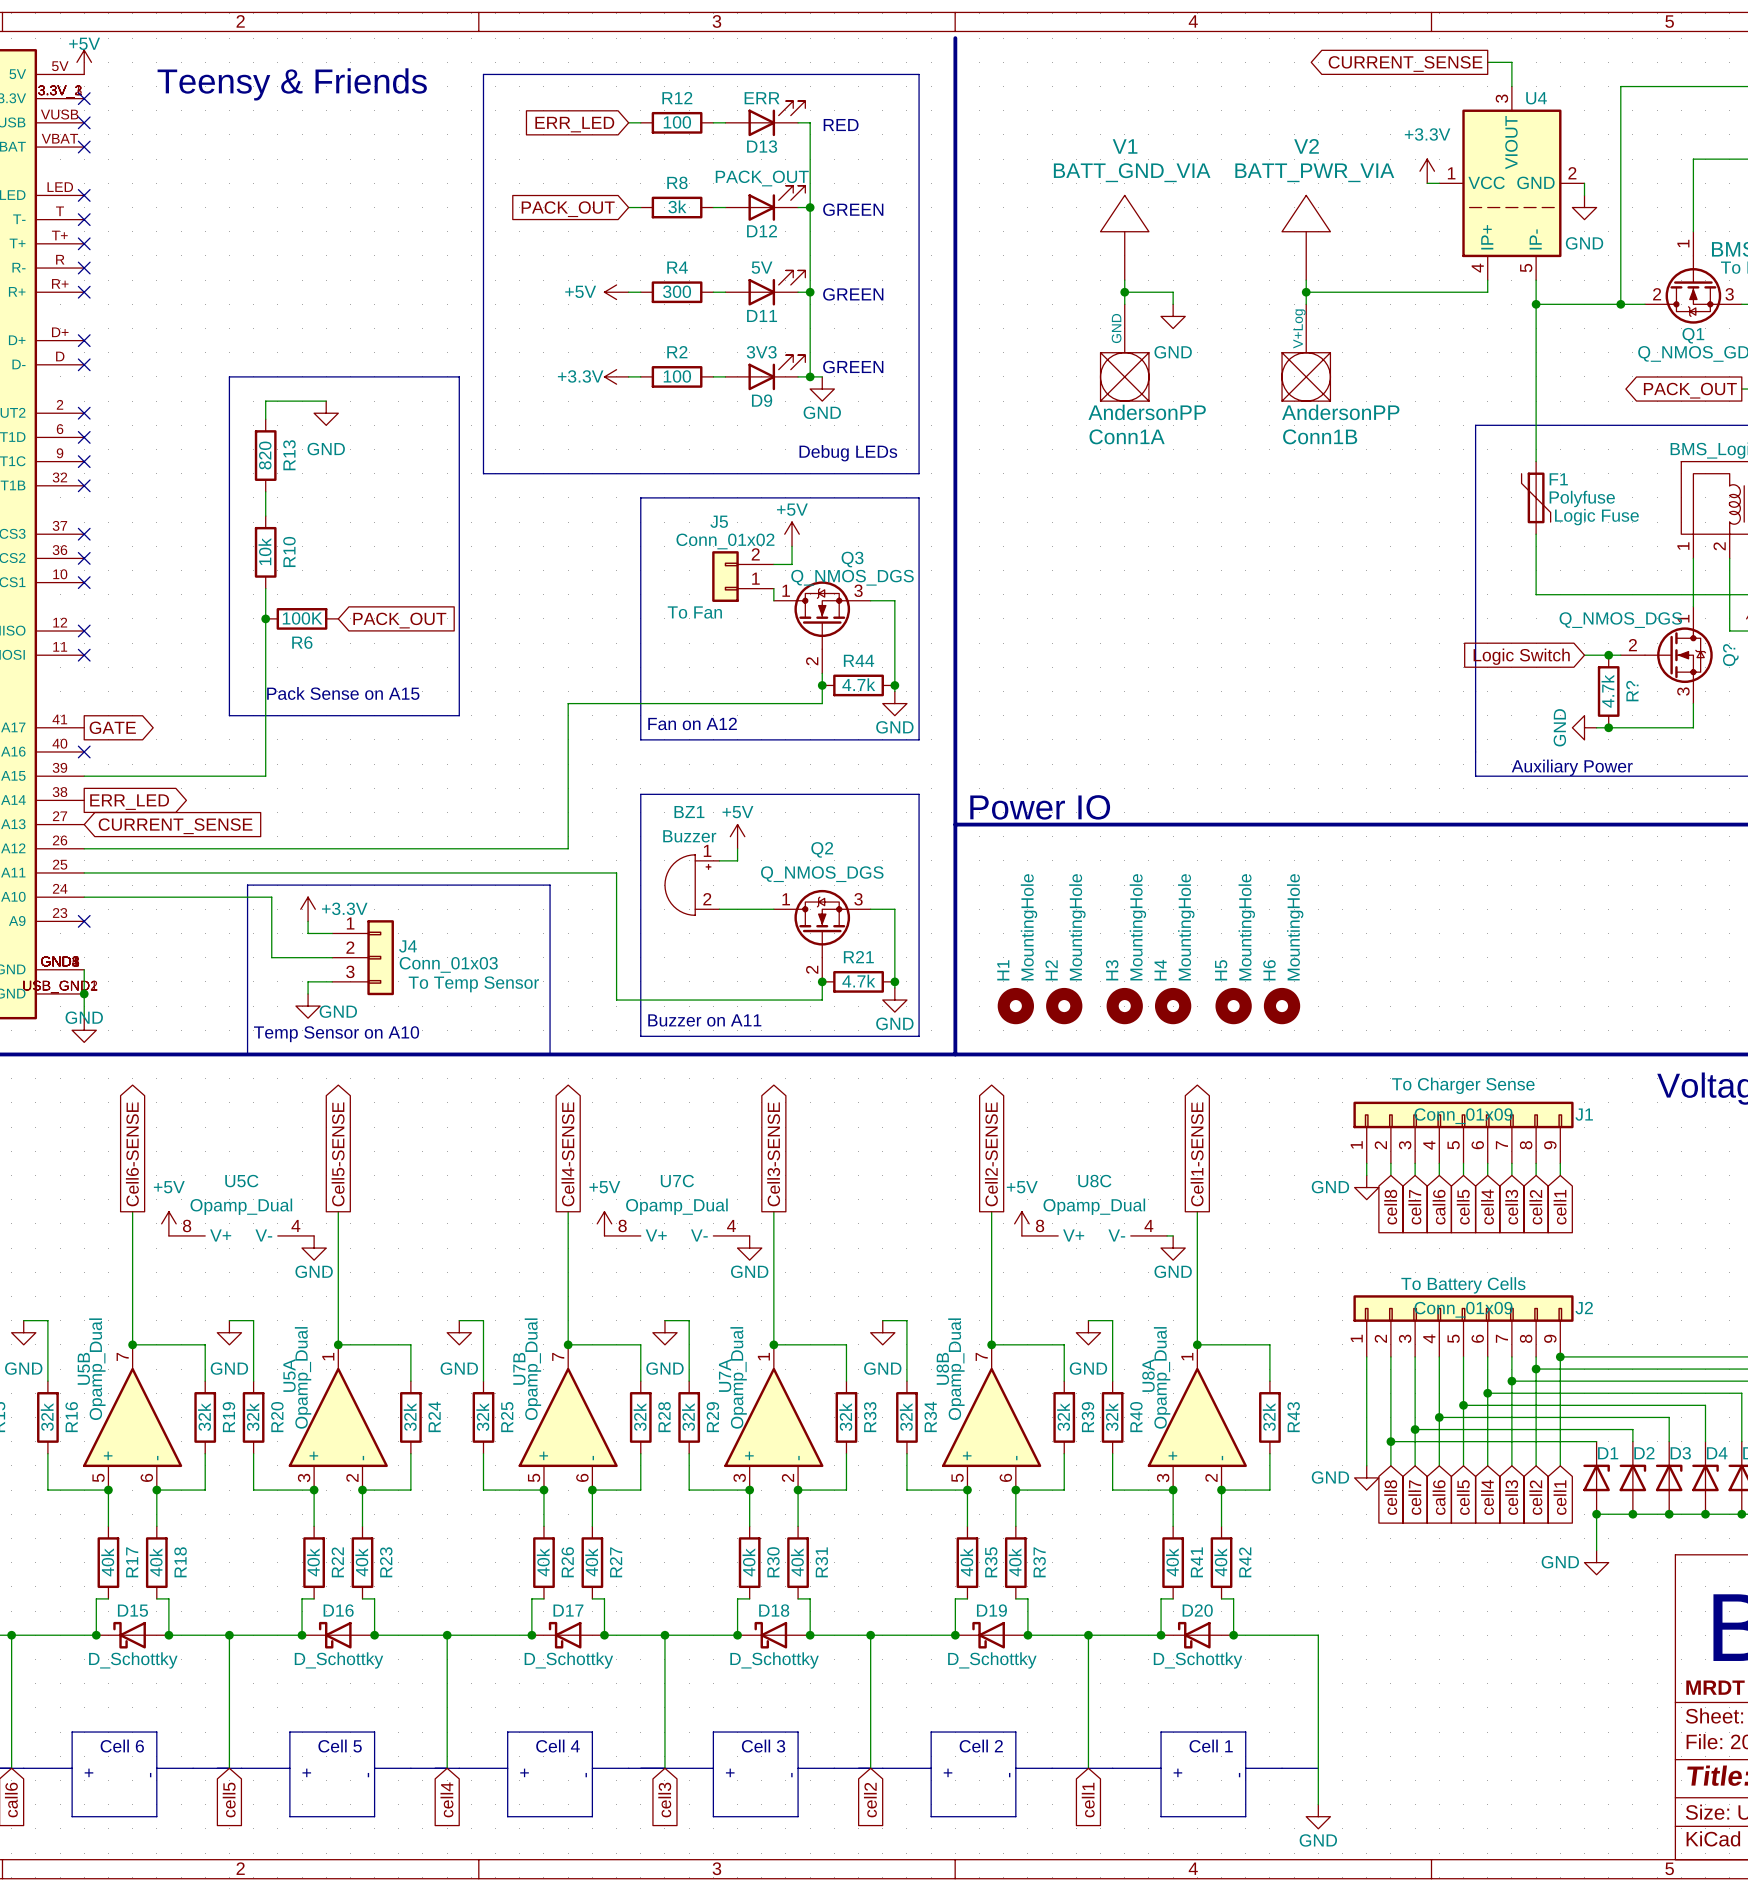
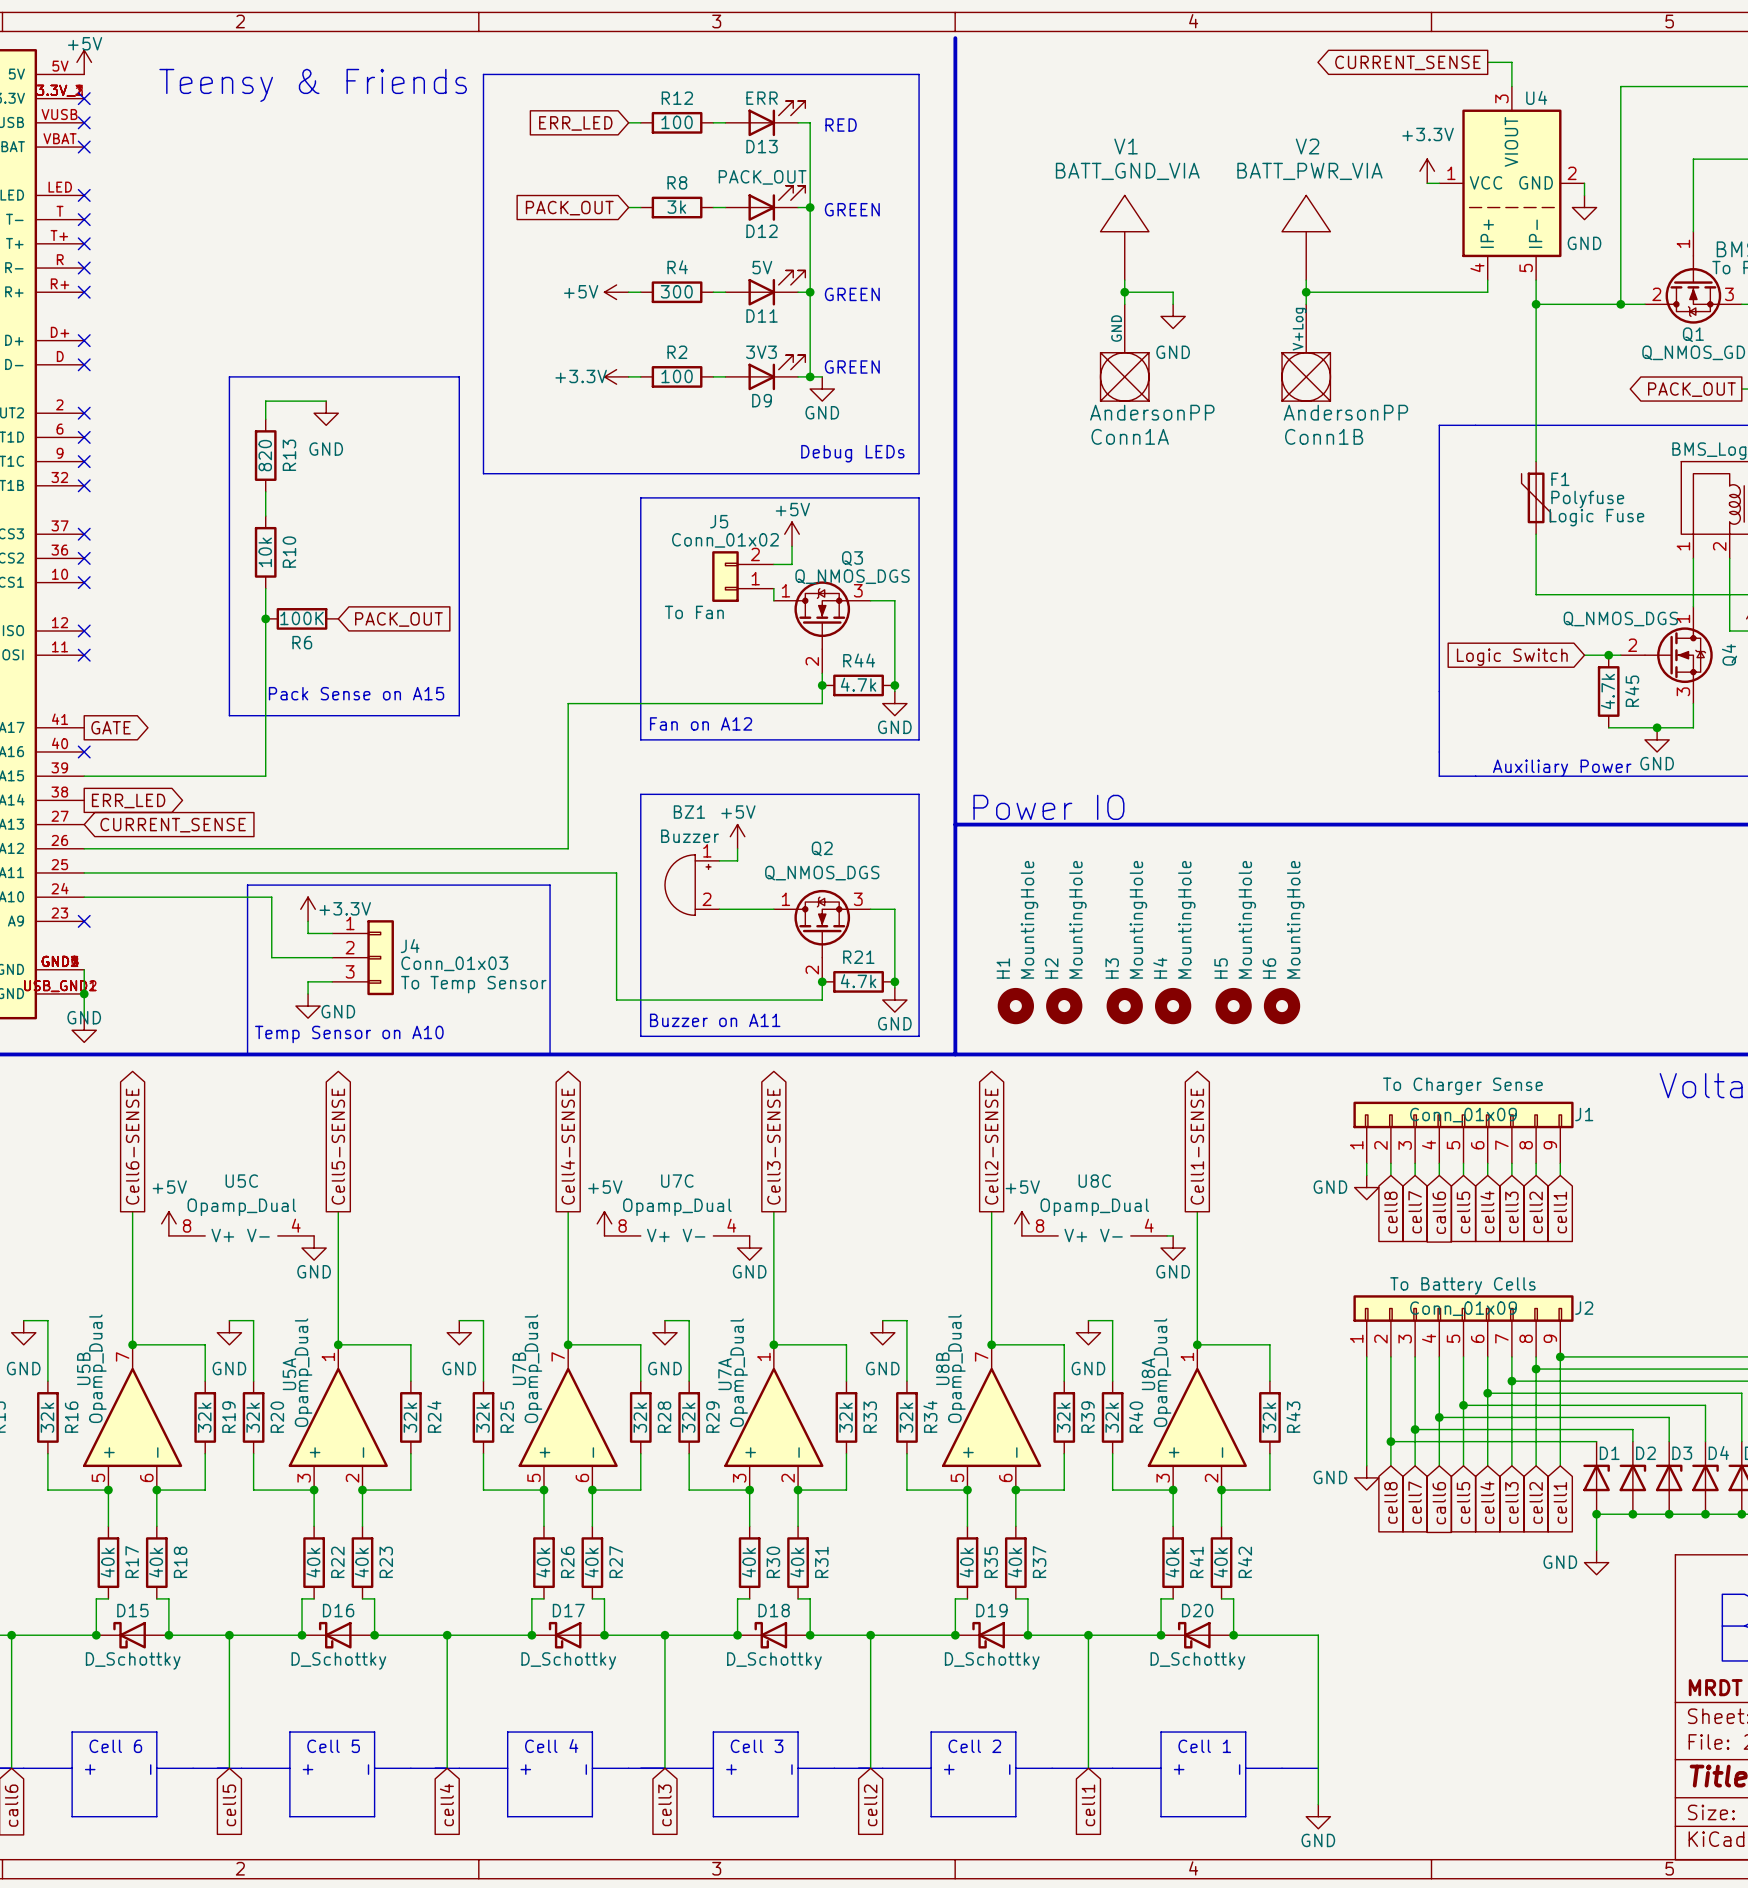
line: (1475, 425) (1475, 776) -> (1475, 425) (1439, 425) (1439, 776) (1475, 776)
Q? name: Q? (1730, 655) -> Q4 (1729, 654)
R? name: R? (1632, 691) -> R45 (1632, 691)
power symbol rotation: 0° (1584, 727) -> 90° counterclockwise (1657, 739)
power symbol position: GND (1584, 727) -> GND (1657, 739)
wire: (1596, 727) (1608, 727) -> none
junction position: (1608, 727) -> (1657, 727)

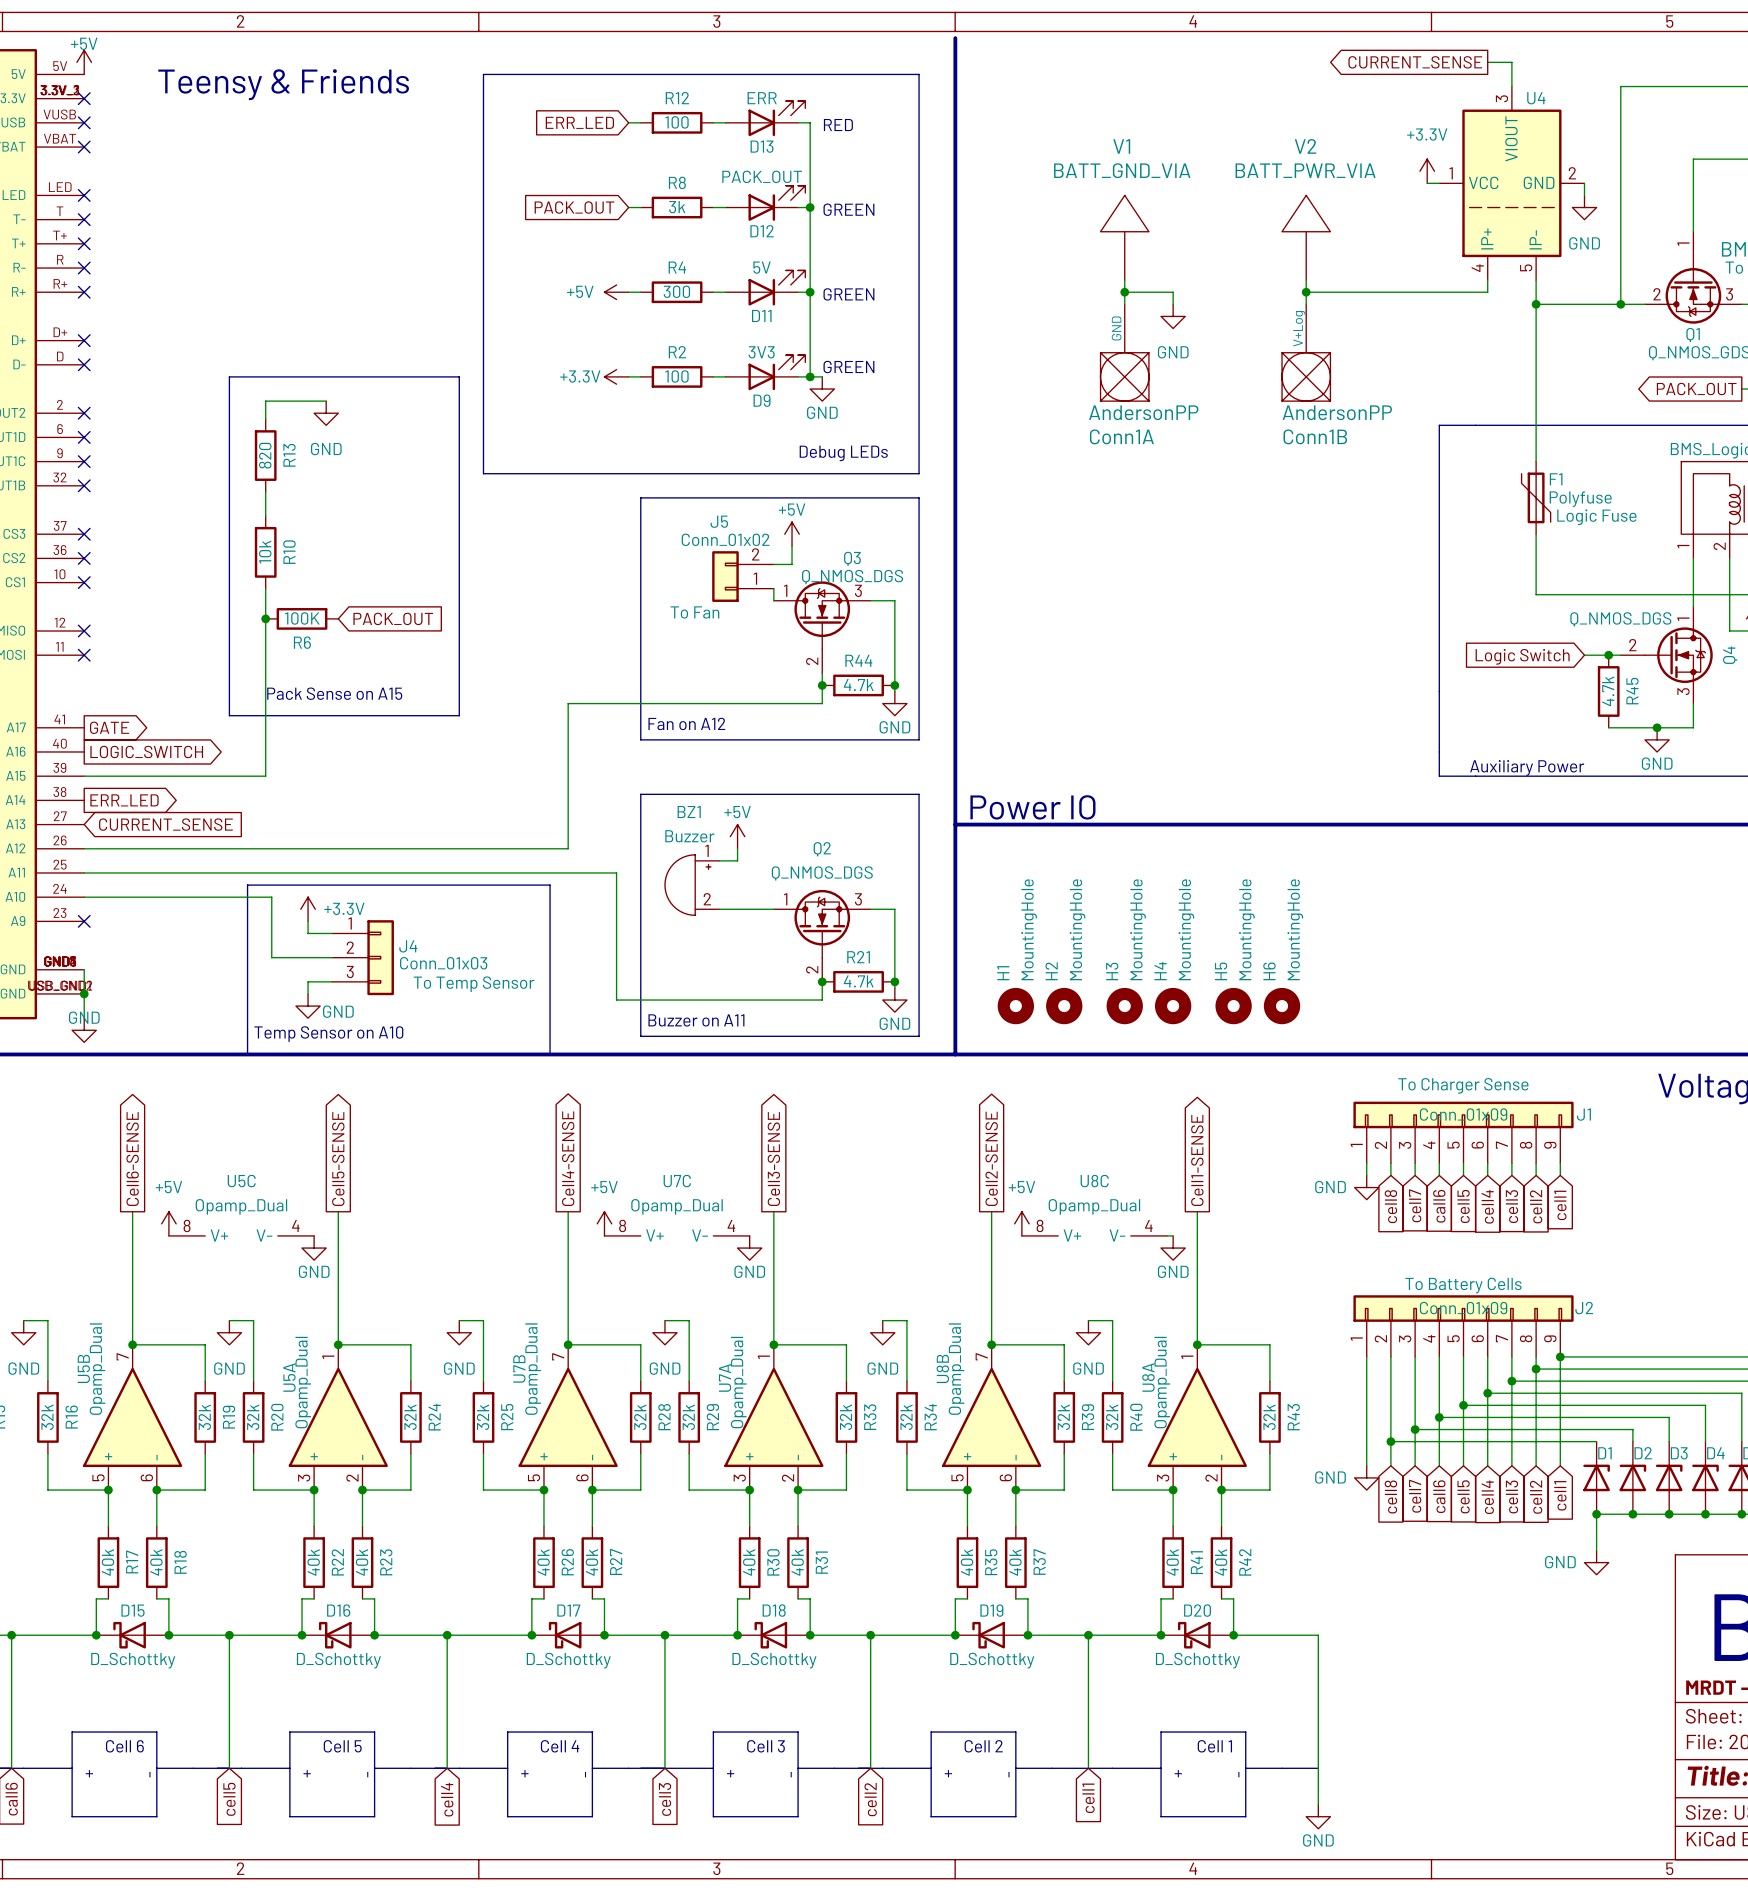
no-connect mark: (84, 751) -> none
global label: none -> LOGIC_SWITCH (146, 752)
text position: Auxiliary Power (1562, 768) -> Auxiliary Power (1527, 767)

